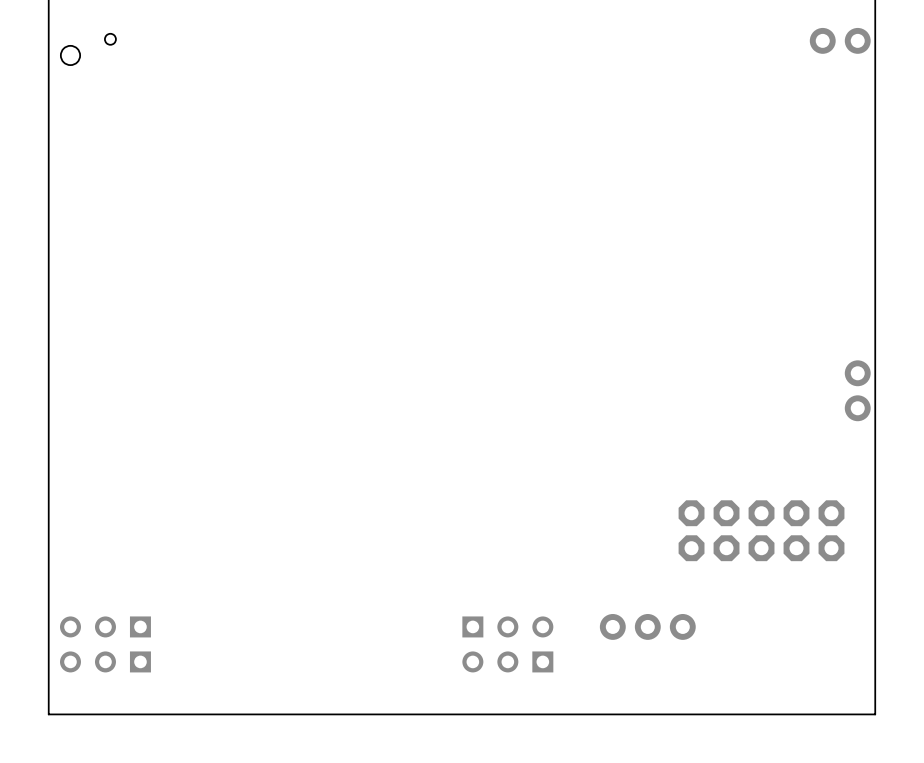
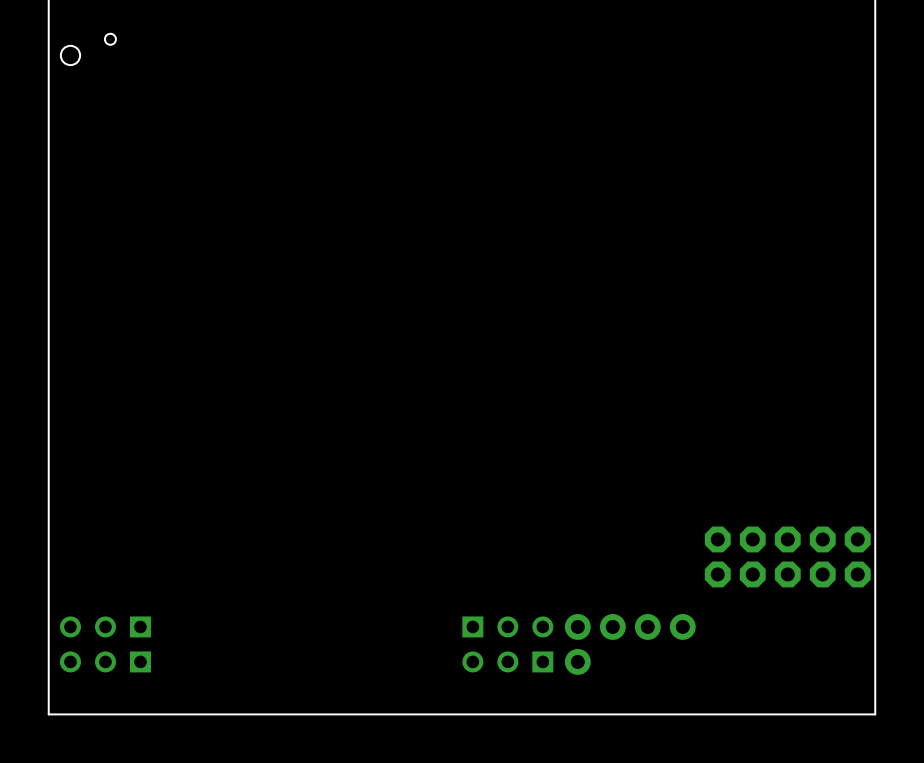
part: (840, 40) -> none
part: (857, 390) -> none
part position: (761, 530) -> (787, 556)
part: none -> (577, 644)

